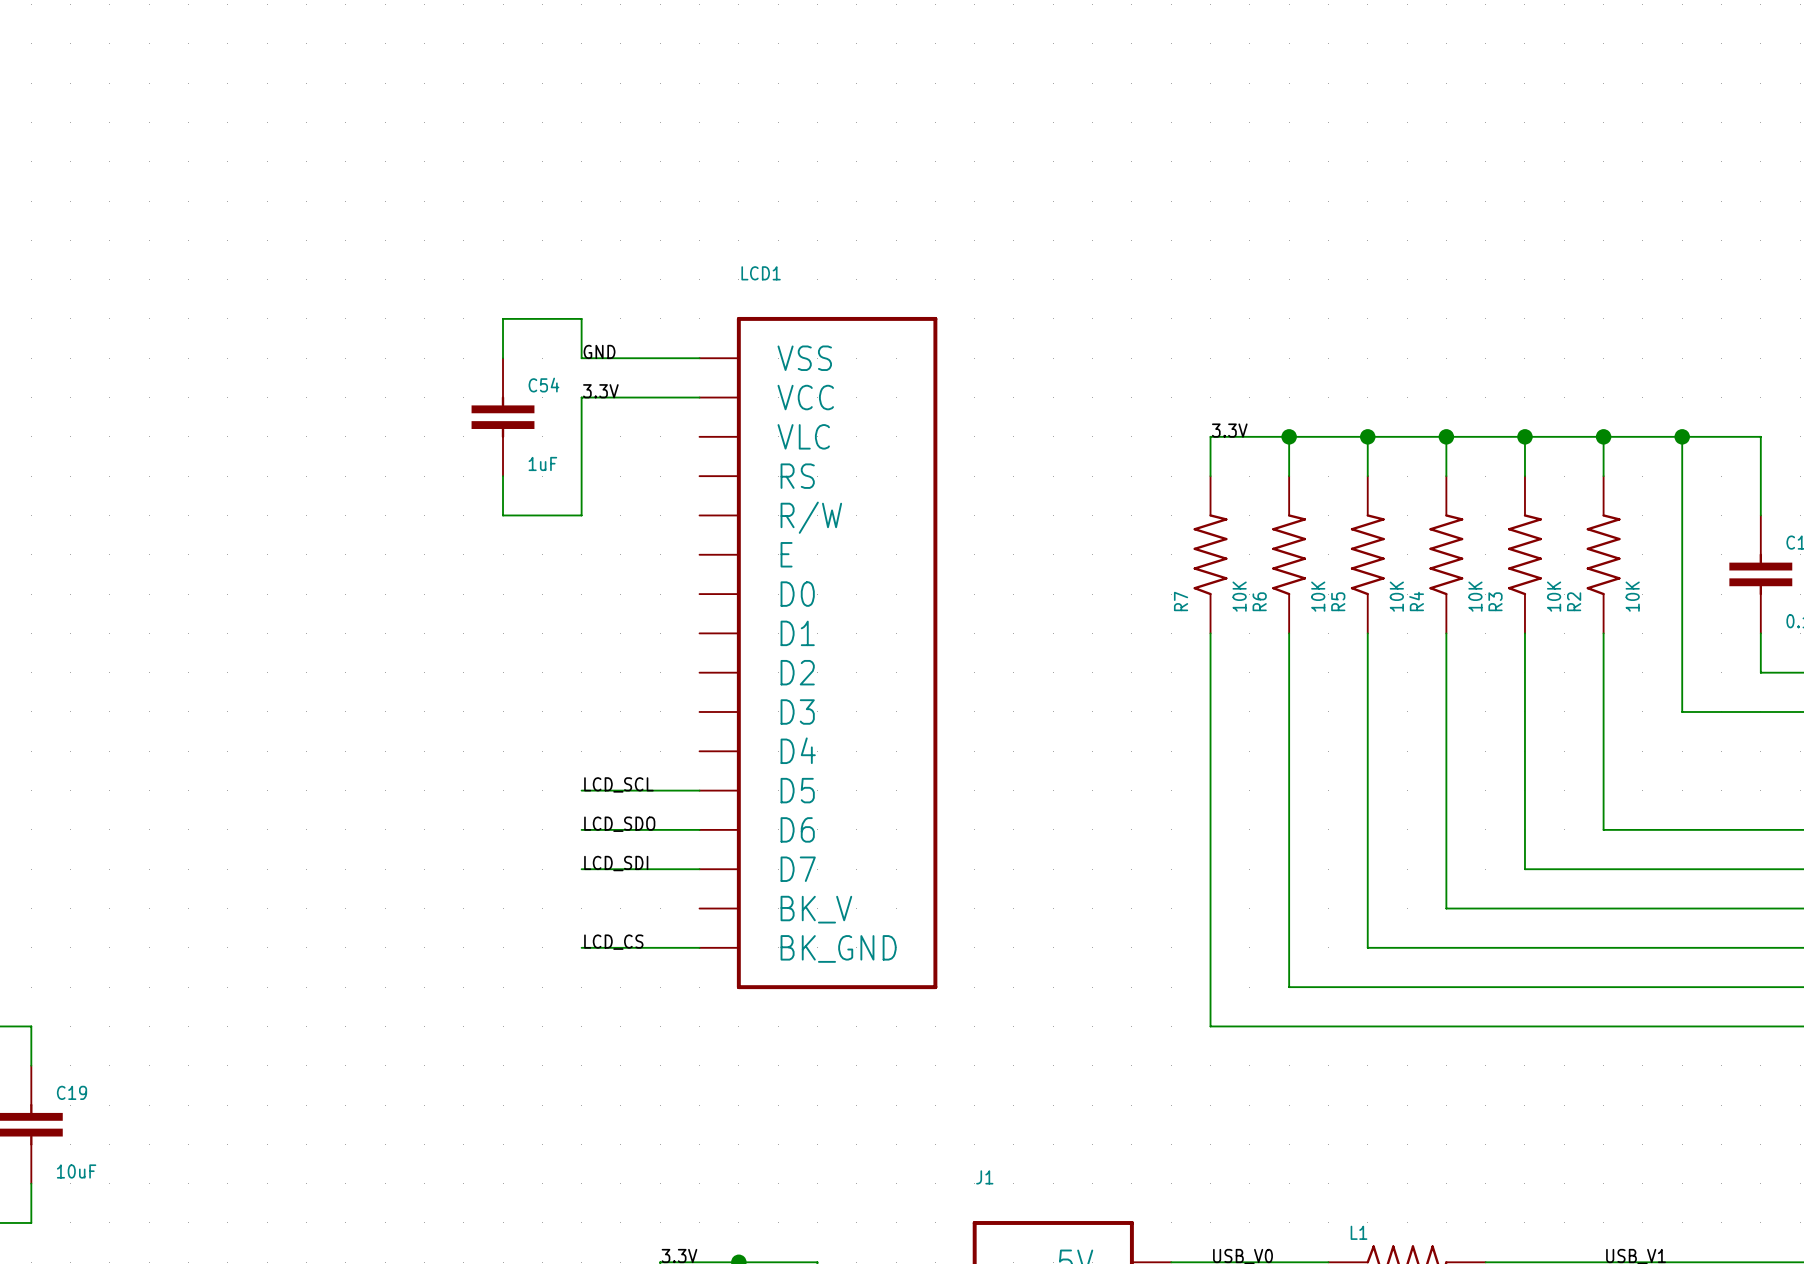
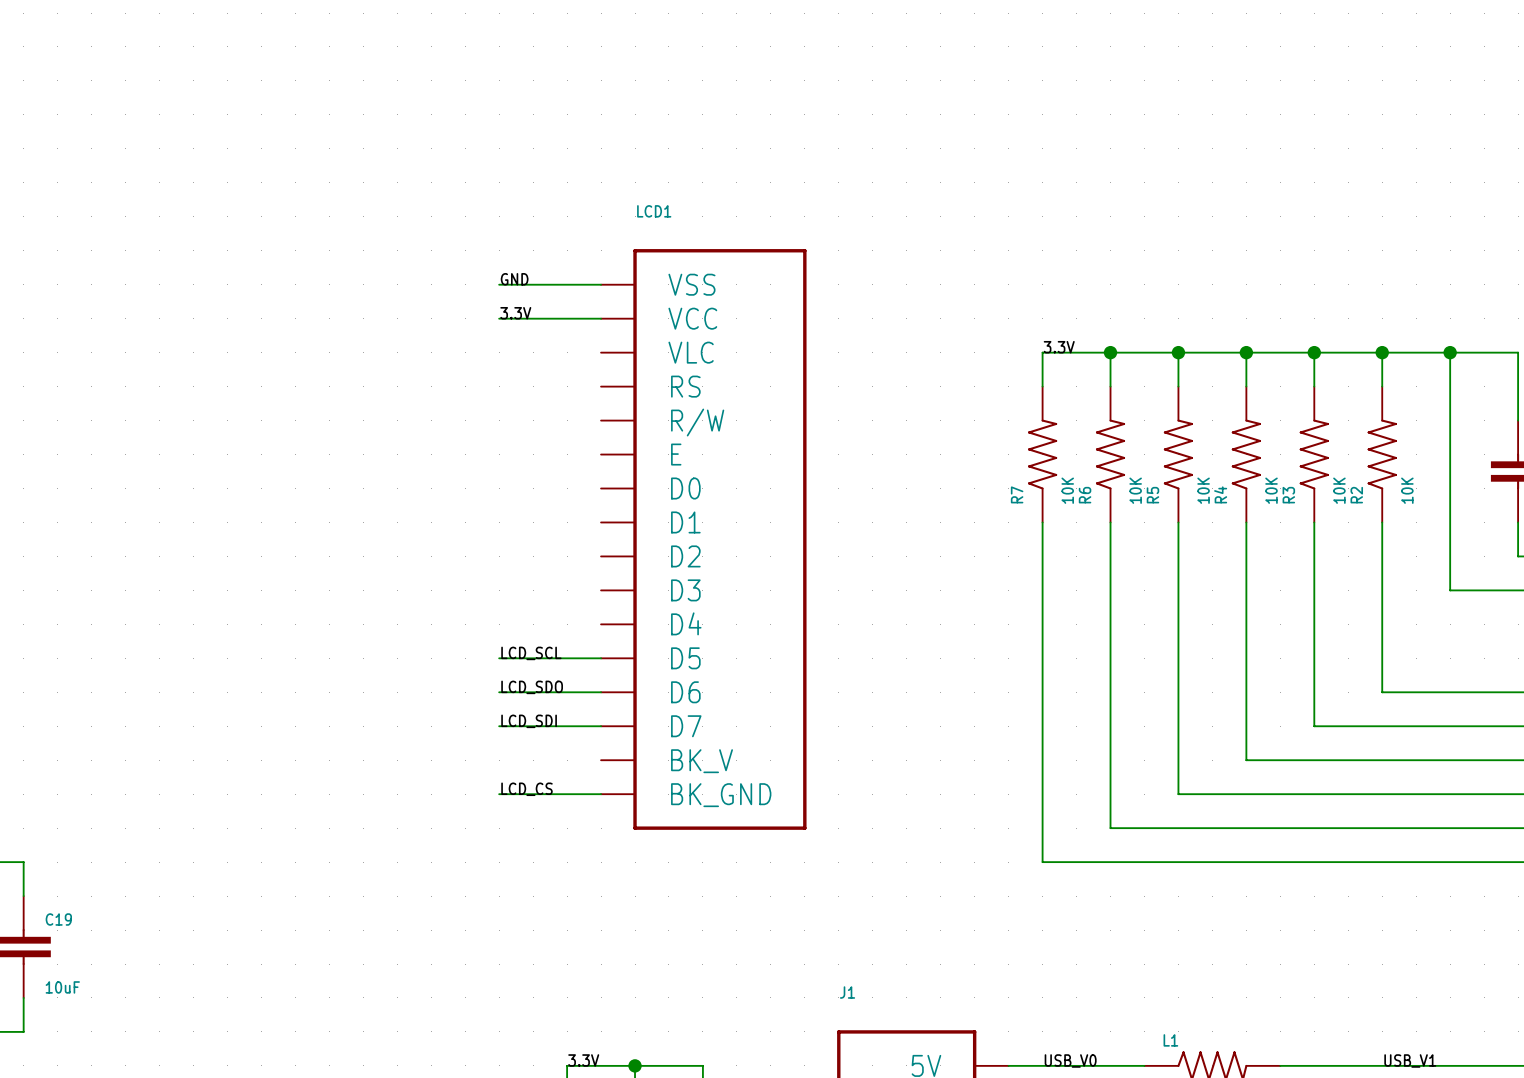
wire: (503, 358) (503, 318) (581, 318) (581, 358) -> none
wire: (581, 397) (581, 515) (503, 515) (503, 476) -> none
C54: 1uF (503, 417) -> none

